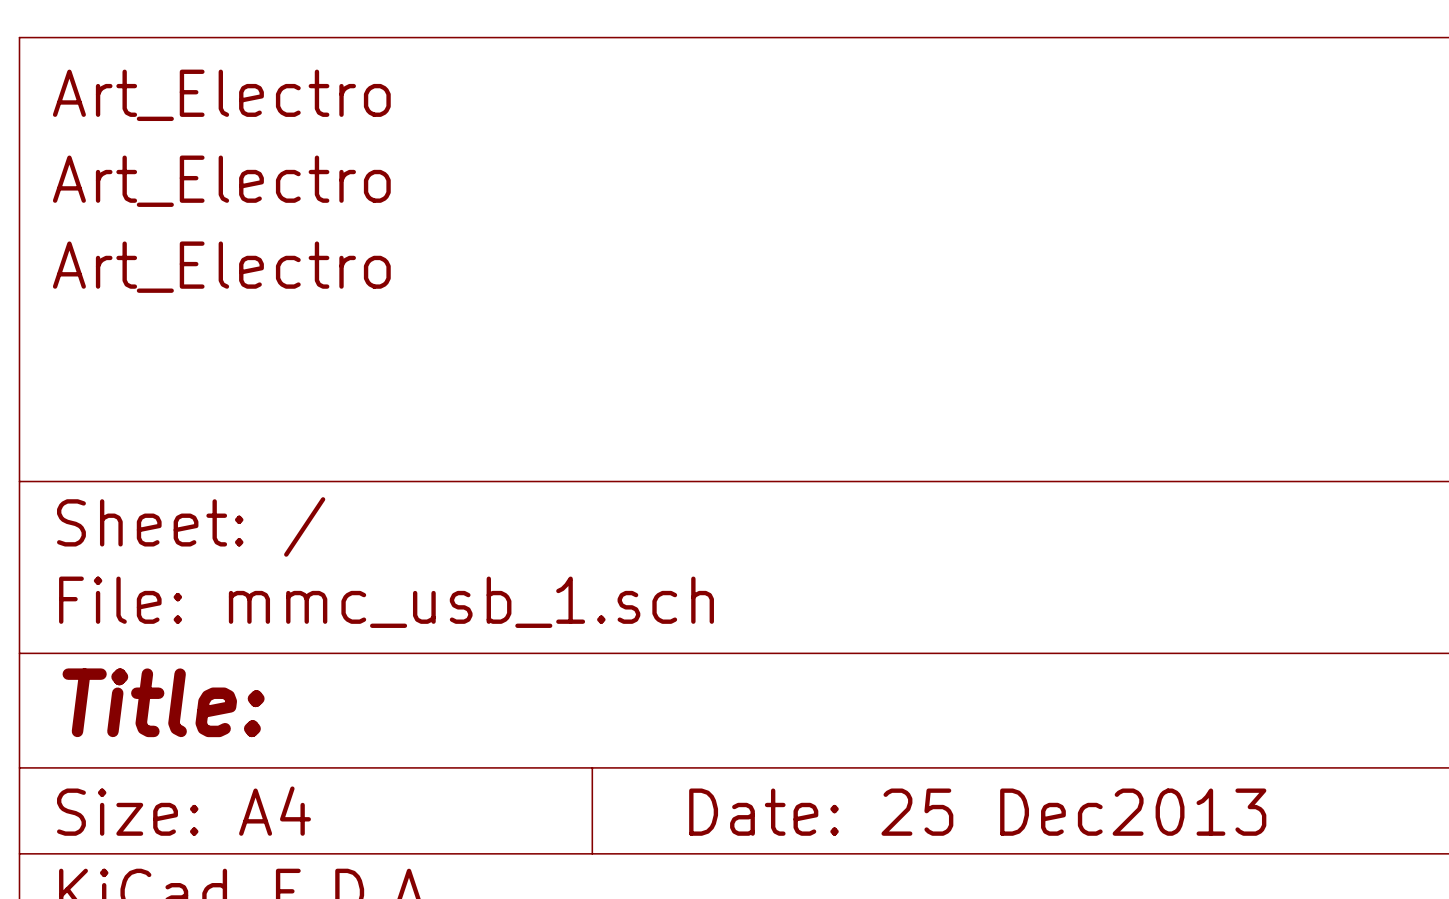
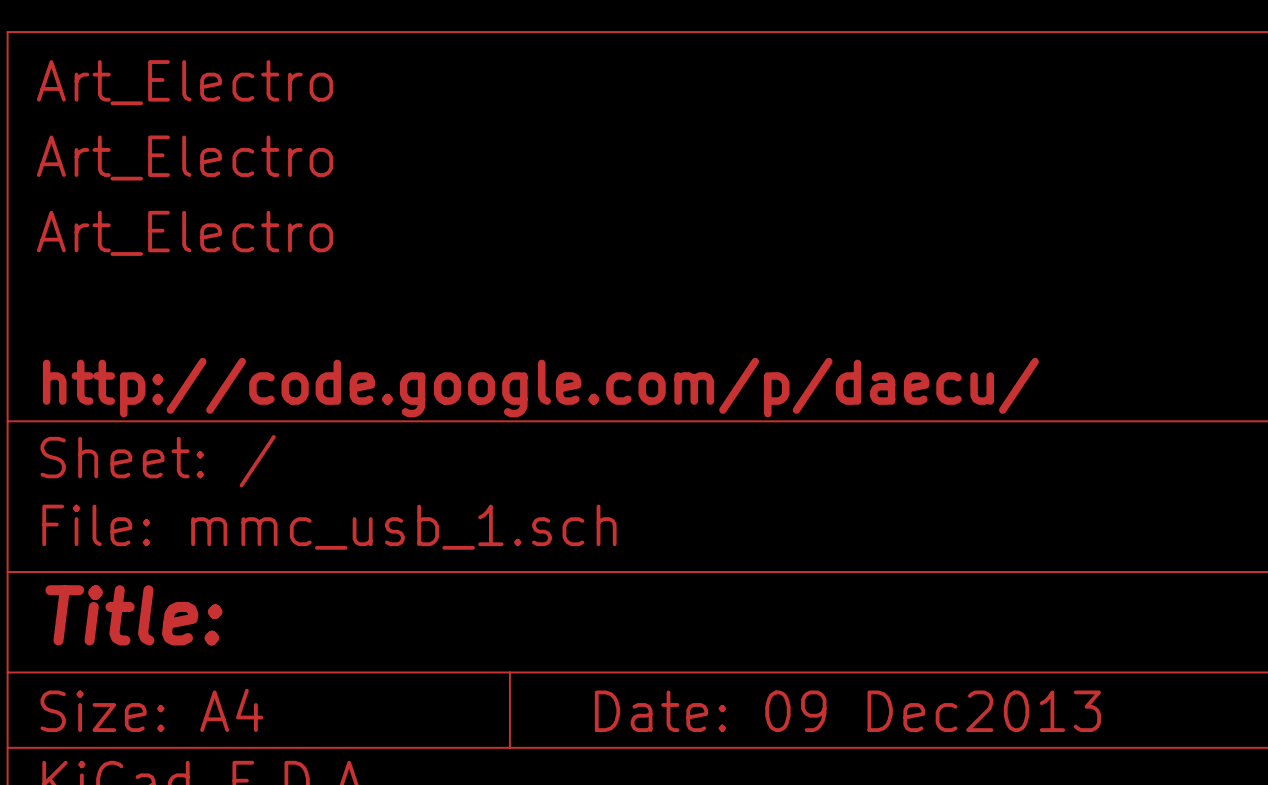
title block: none -> http://code.google.com/p/daecu/ (540, 387)
title block: Date: 25 Dec2013 (977, 812) -> Date: 09 Dec2013 (847, 711)

